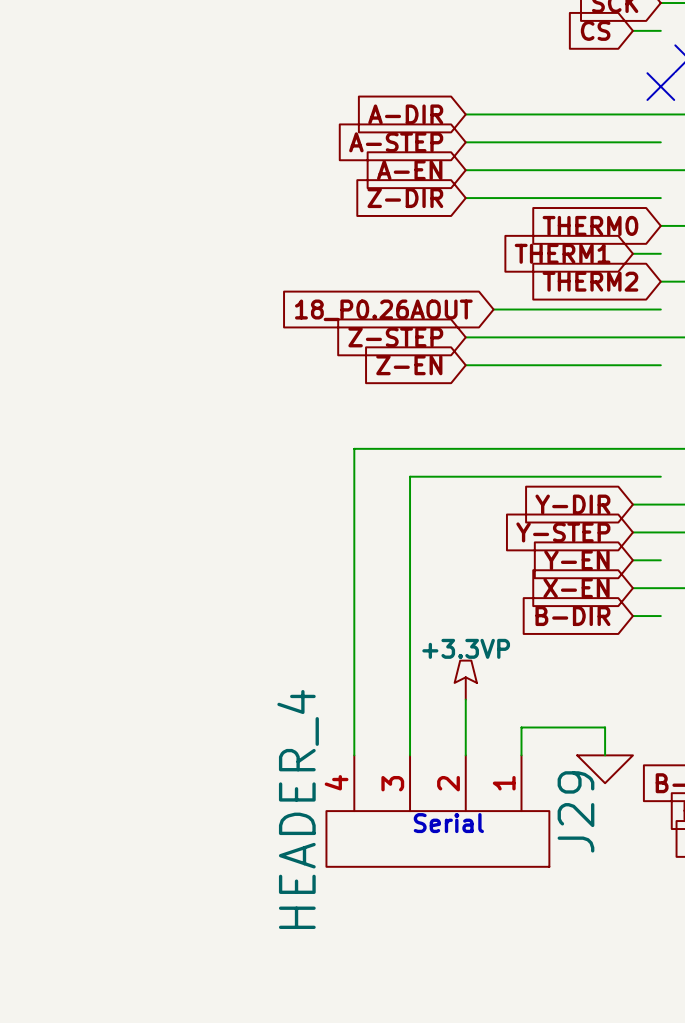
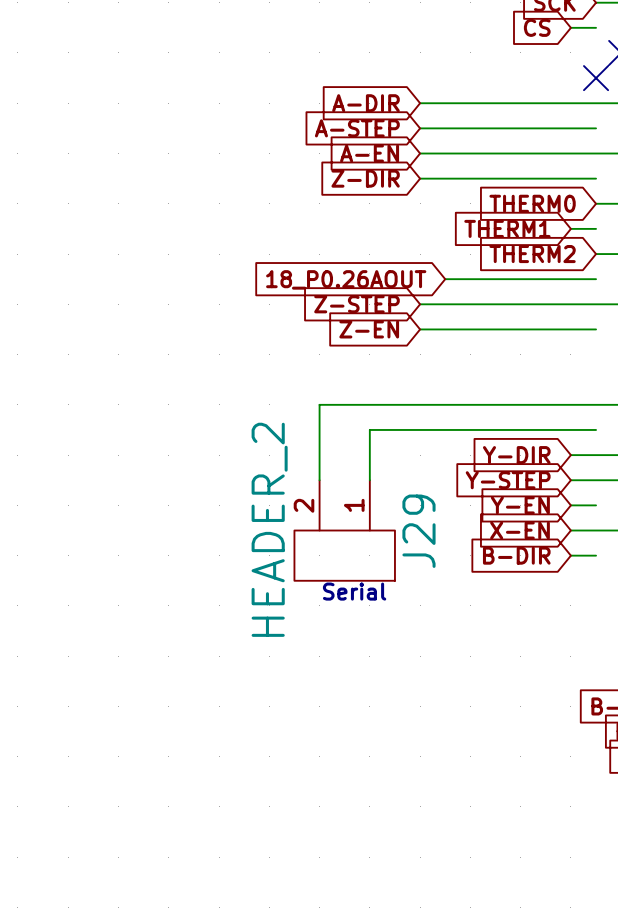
wire: (354, 532) (354, 755) -> none
wire: (410, 532) (410, 755) -> none
power symbol: +3.3VP (465, 680) -> none
wire: (465, 699) (465, 755) -> none
J29 symbol: [326, 755, 550, 867] -> [294, 480, 395, 581]
wire: (521, 755) (521, 727) (605, 727) (605, 755) -> none
power symbol: (605, 769) -> none
J29 value: HEADER_4 (298, 809) -> HEADER_2 (269, 529)
J29 name position: J29 (575, 811) -> J29 (418, 531)
text position: Serial (448, 823) -> Serial (354, 591)

